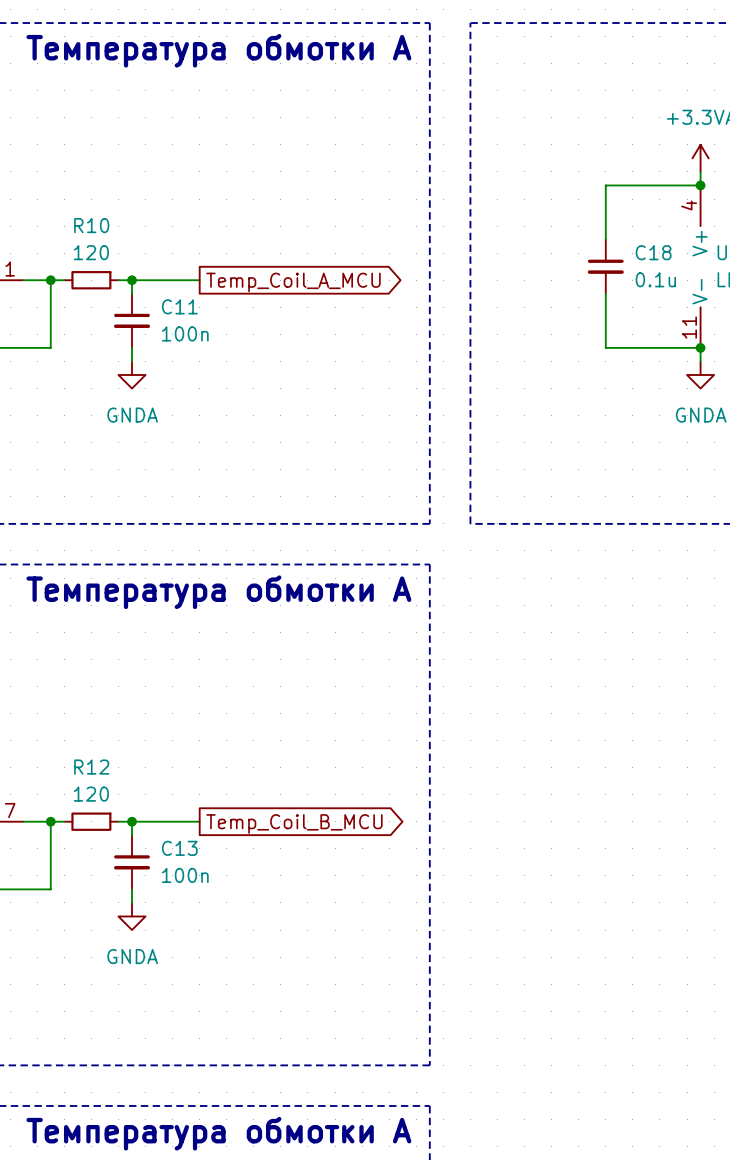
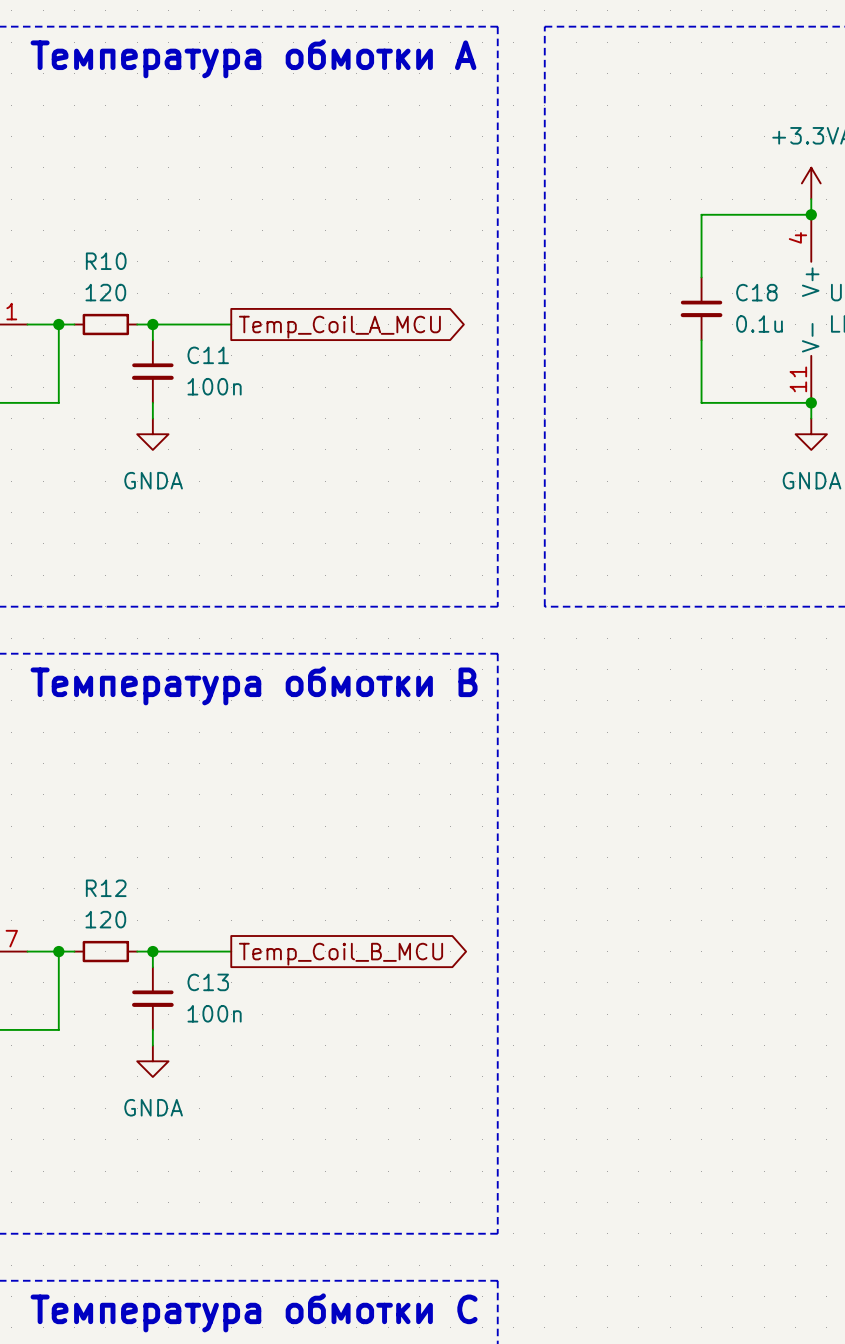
text: Температура обмотки А (218, 592) -> Температура обмотки B (254, 685)
text: Температура обмотки А (218, 1133) -> Температура обмотки С (254, 1312)

